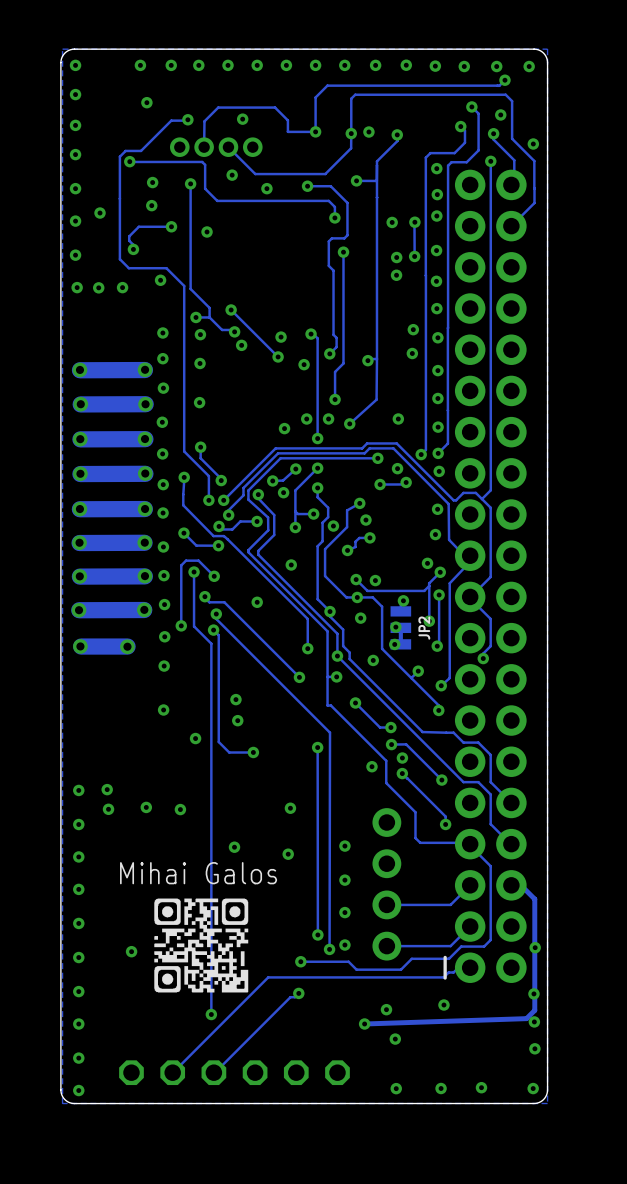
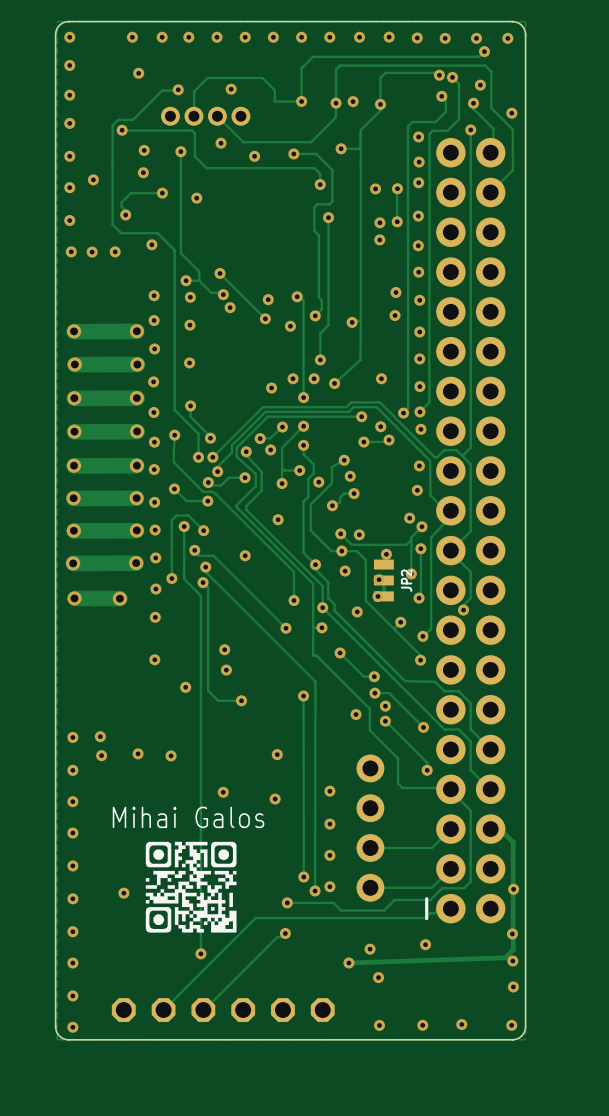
track: none -> (439, 75) (437, 72) (385, 72) (380, 78) (380, 104)
via: none -> (439, 75)

